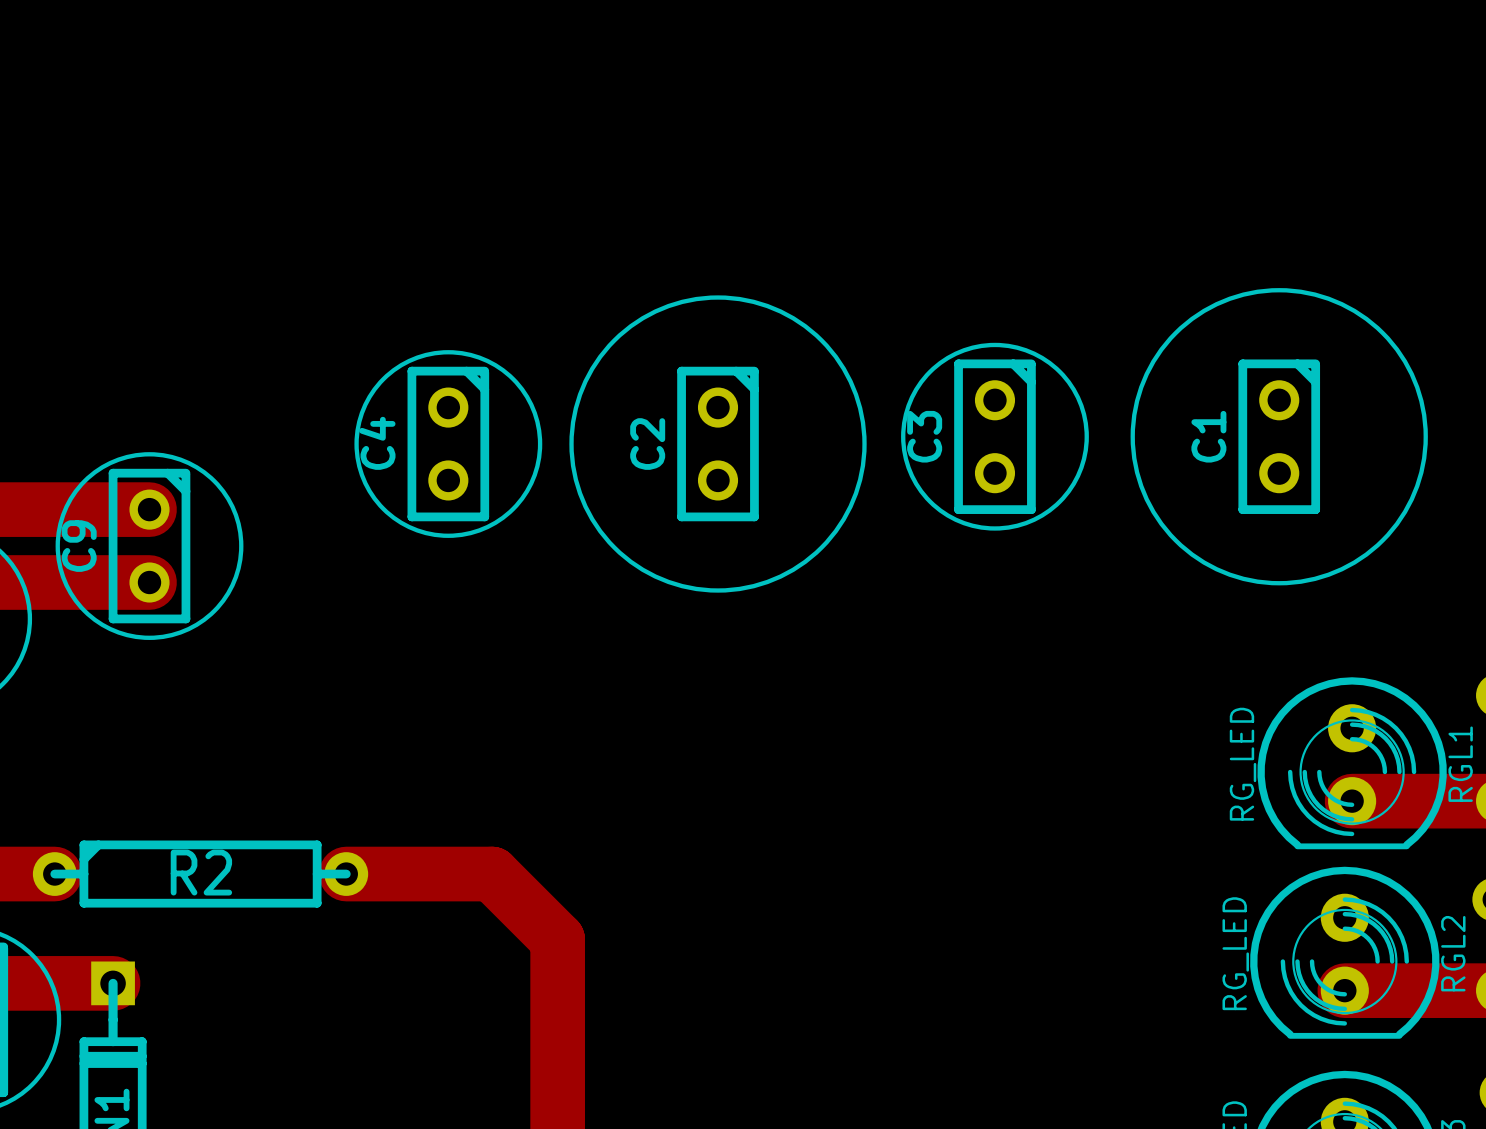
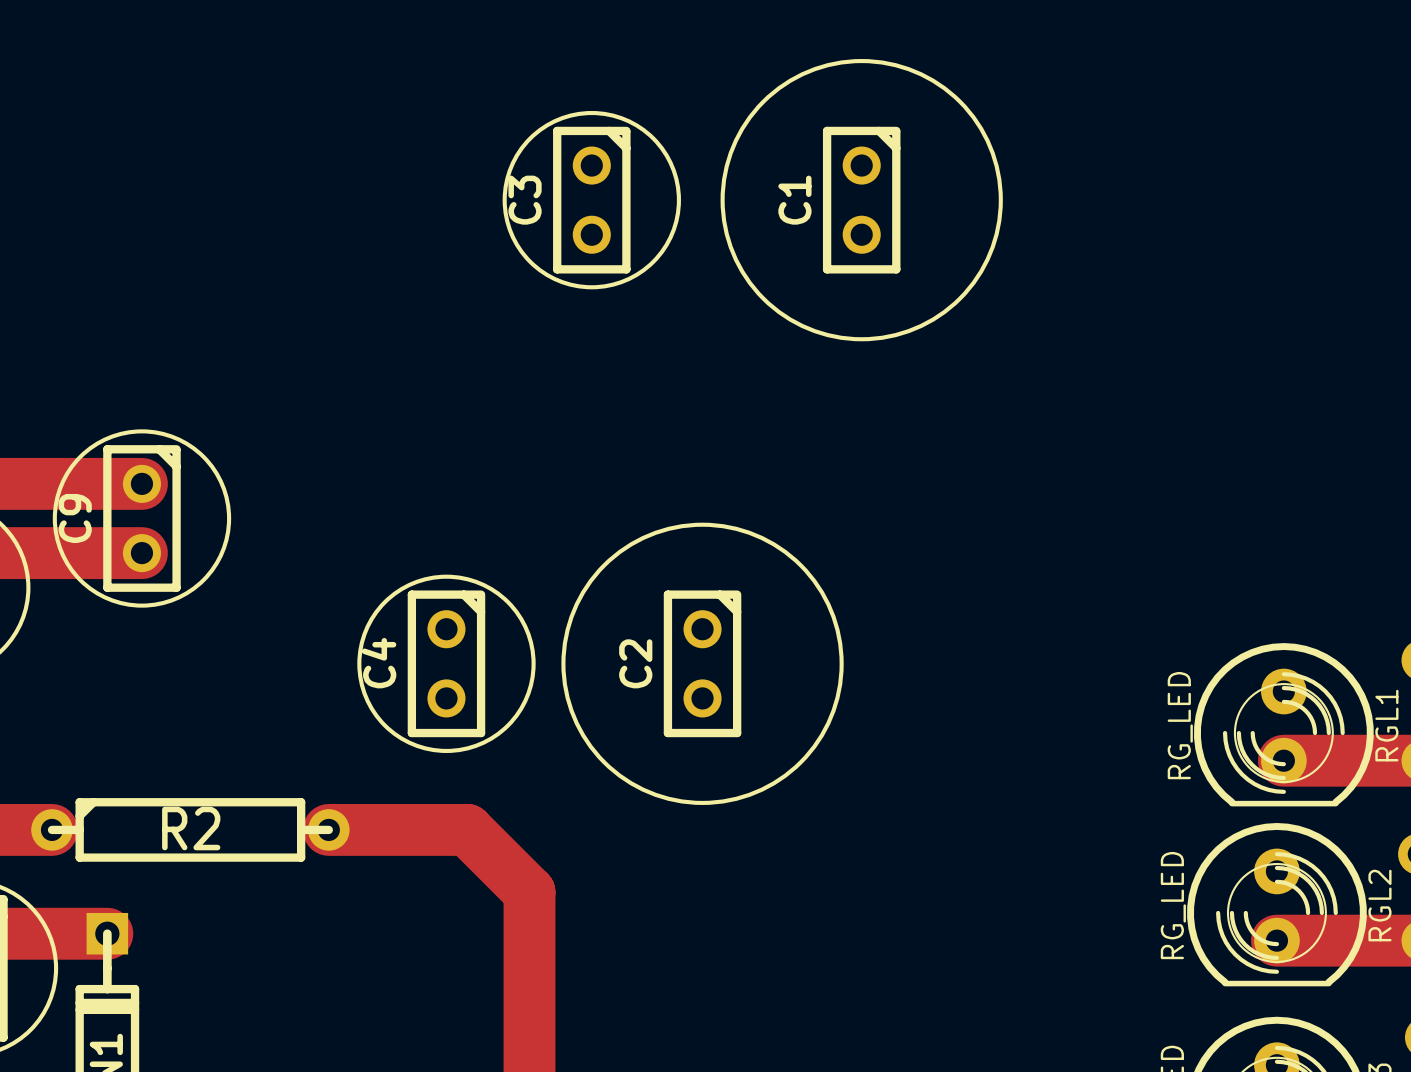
C3 position: (994, 436) -> (591, 200)
C1 position: (1279, 436) -> (861, 200)
C4 position: (448, 444) -> (446, 663)
C2 position: (718, 444) -> (702, 663)

